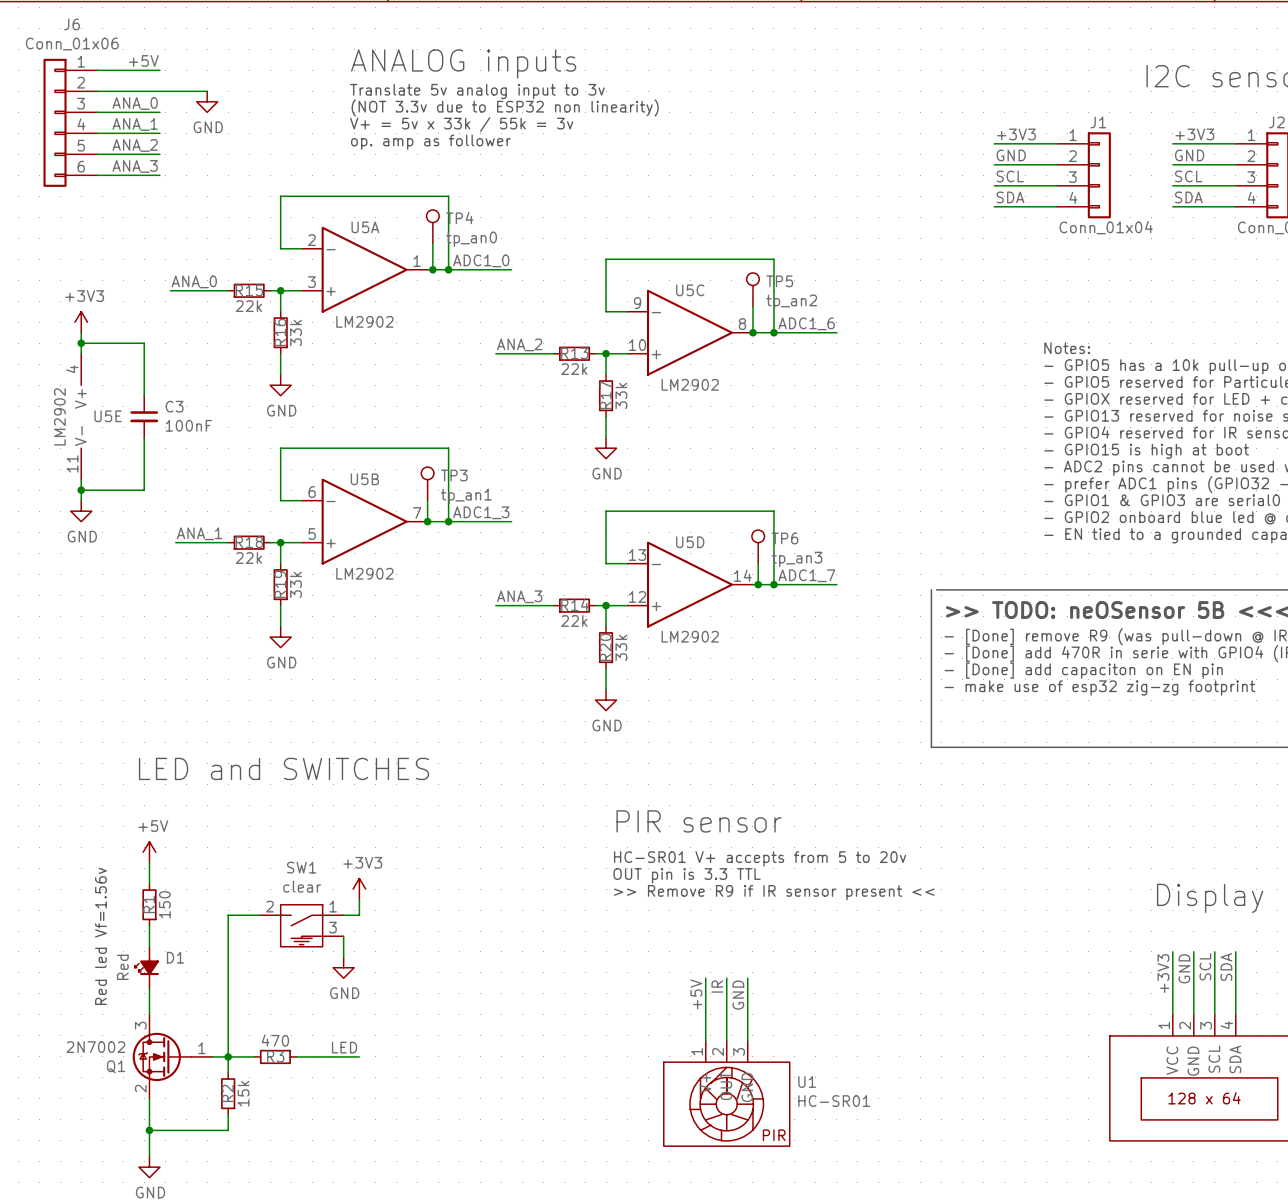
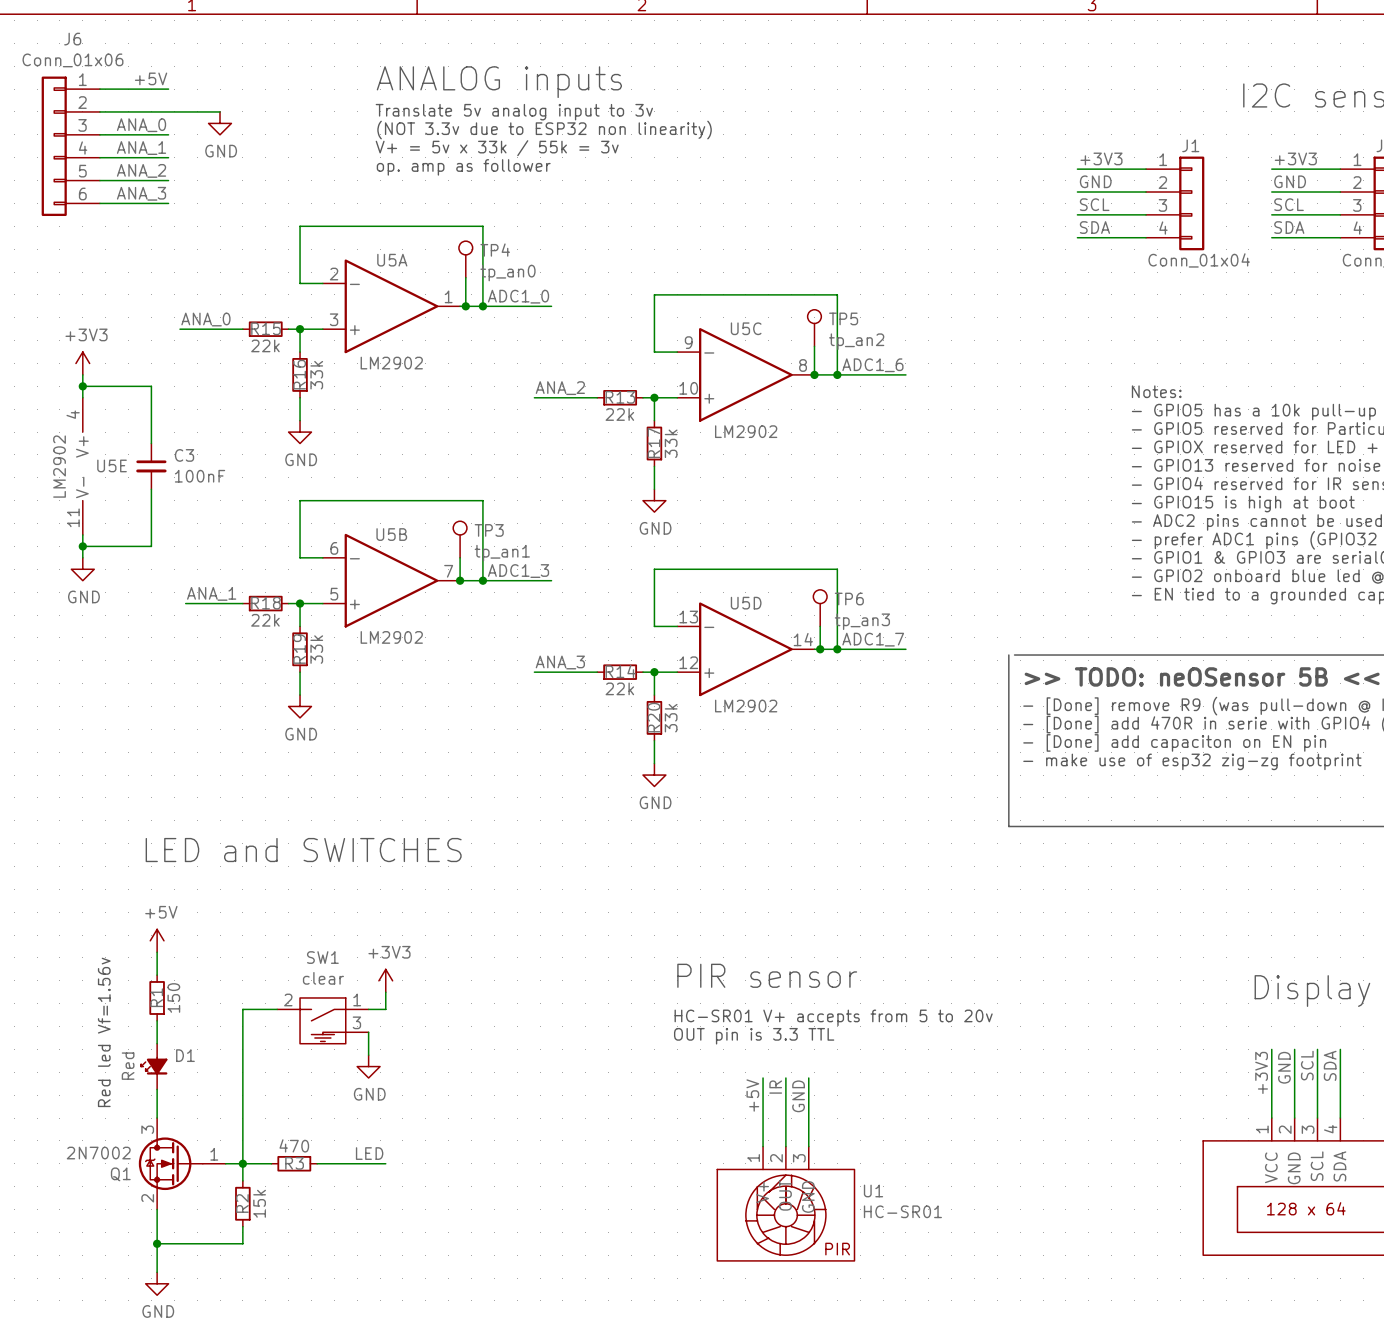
text position: PIR sensor (699, 821) -> PIR sensor (767, 975)
text position: HC-SR01 V+ accepts from 5 to 20v (760, 858) -> HC-SR01 V+ accepts from 5 to 20v (833, 1017)
text position: OUT pin is 3.3 TTL (687, 875) -> OUT pin is 3.3 TTL (754, 1036)
text: >> Remove R9 if IR sensor present << (774, 892) -> none

